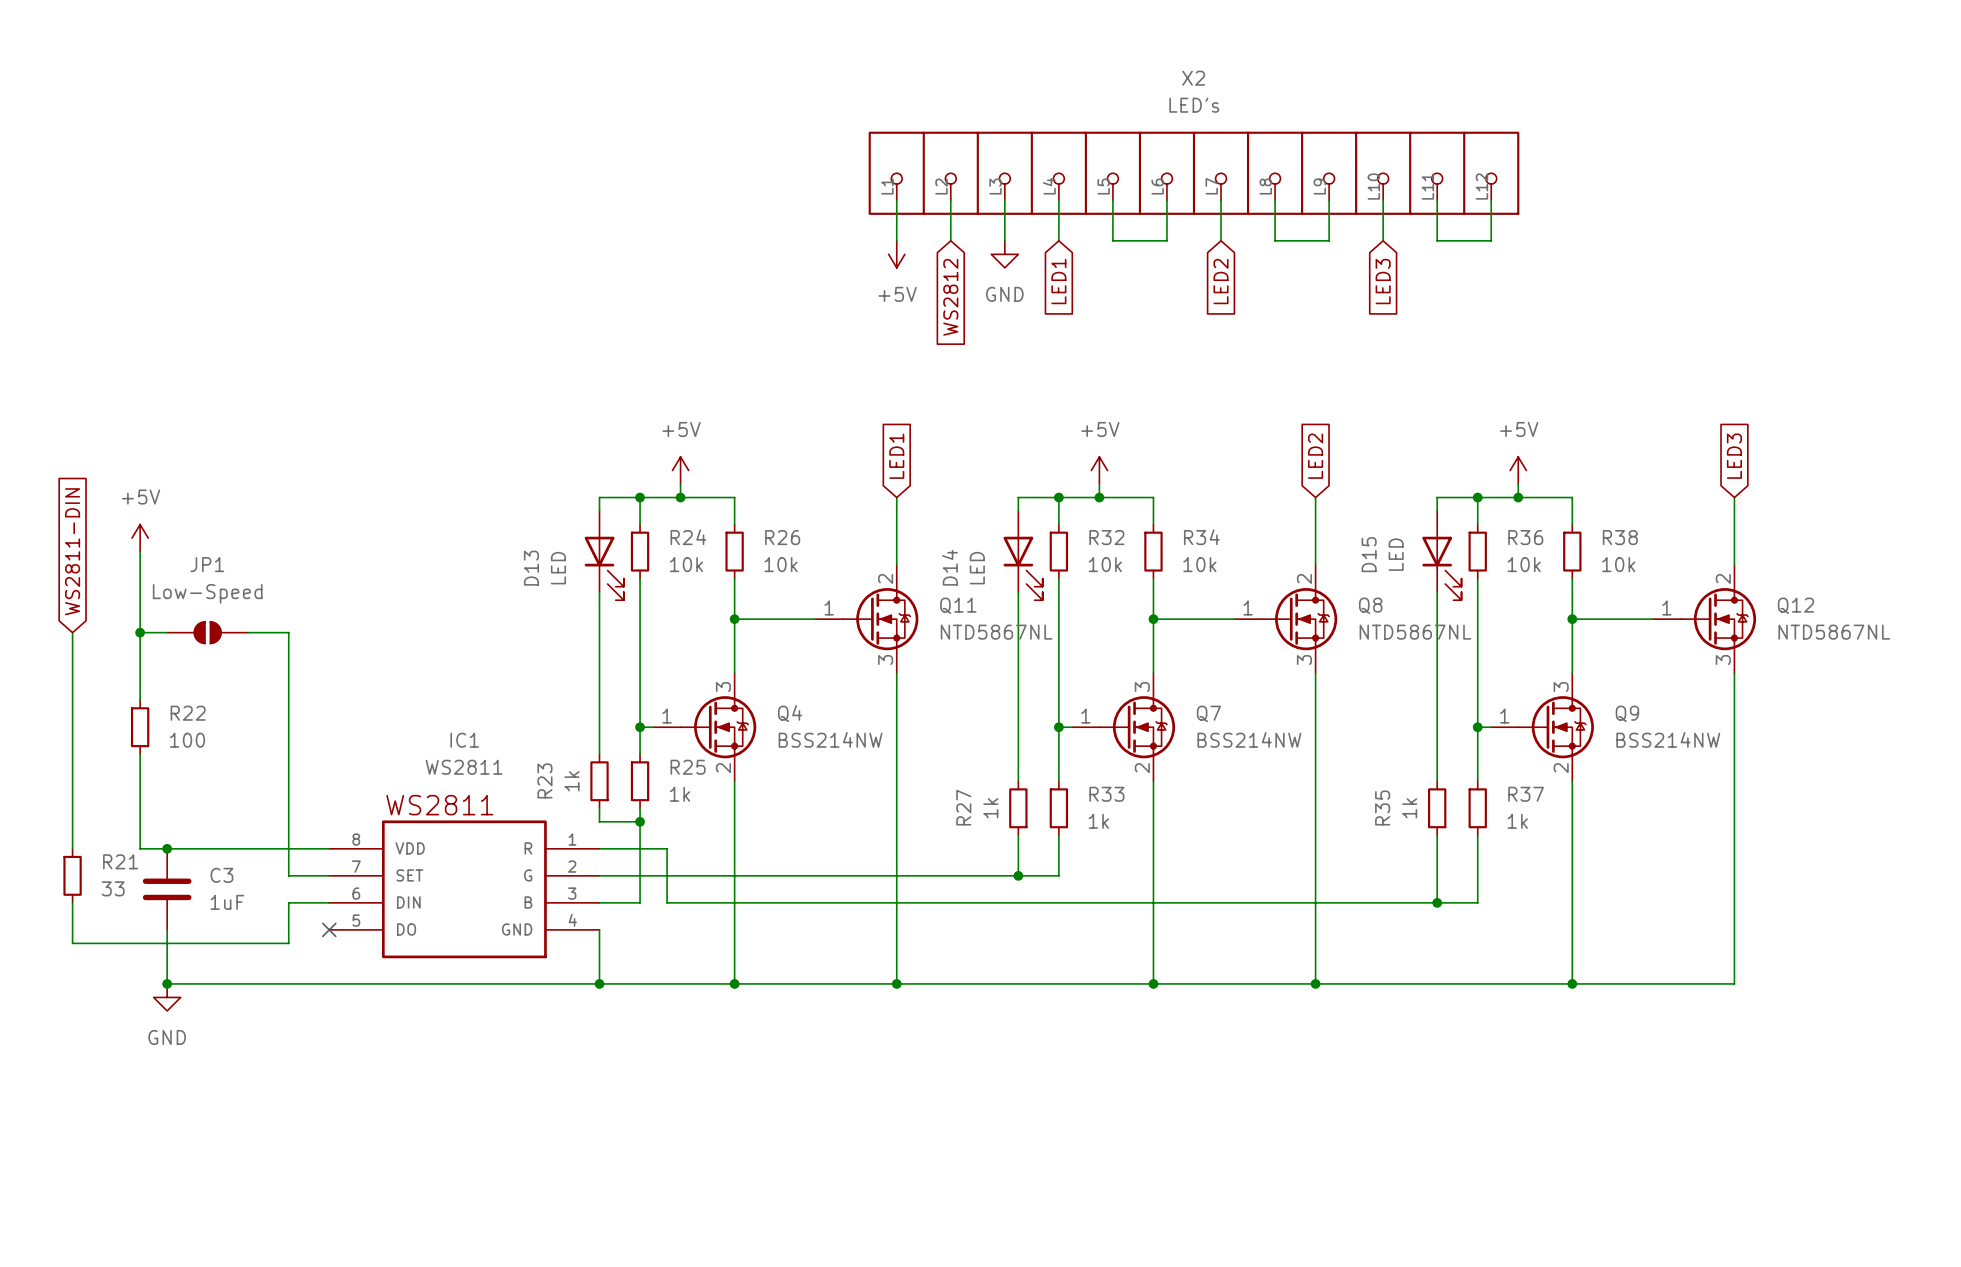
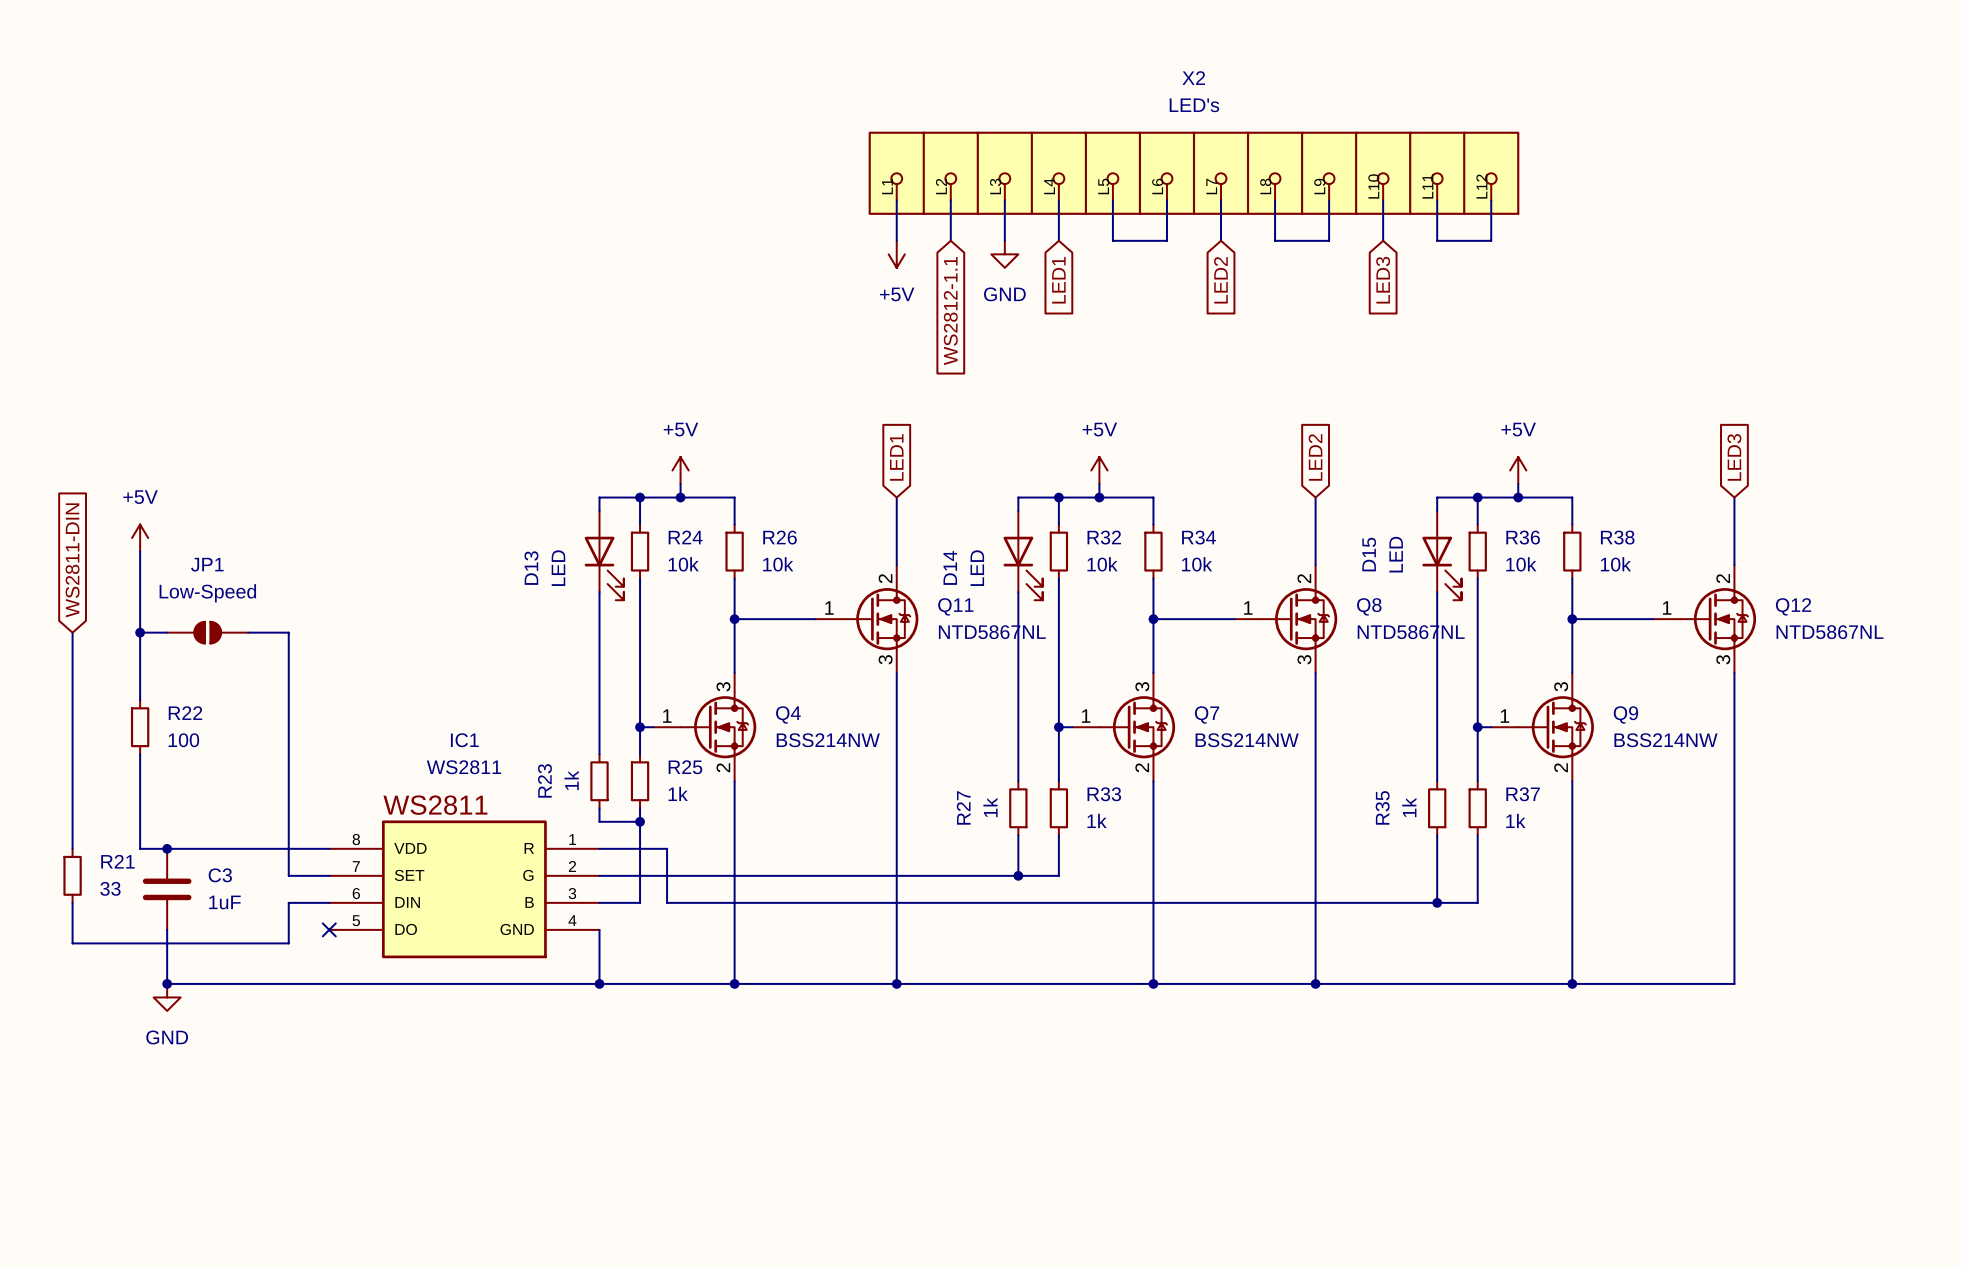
global label: WS2812 (950, 297) -> WS2812-1.1 (950, 311)

